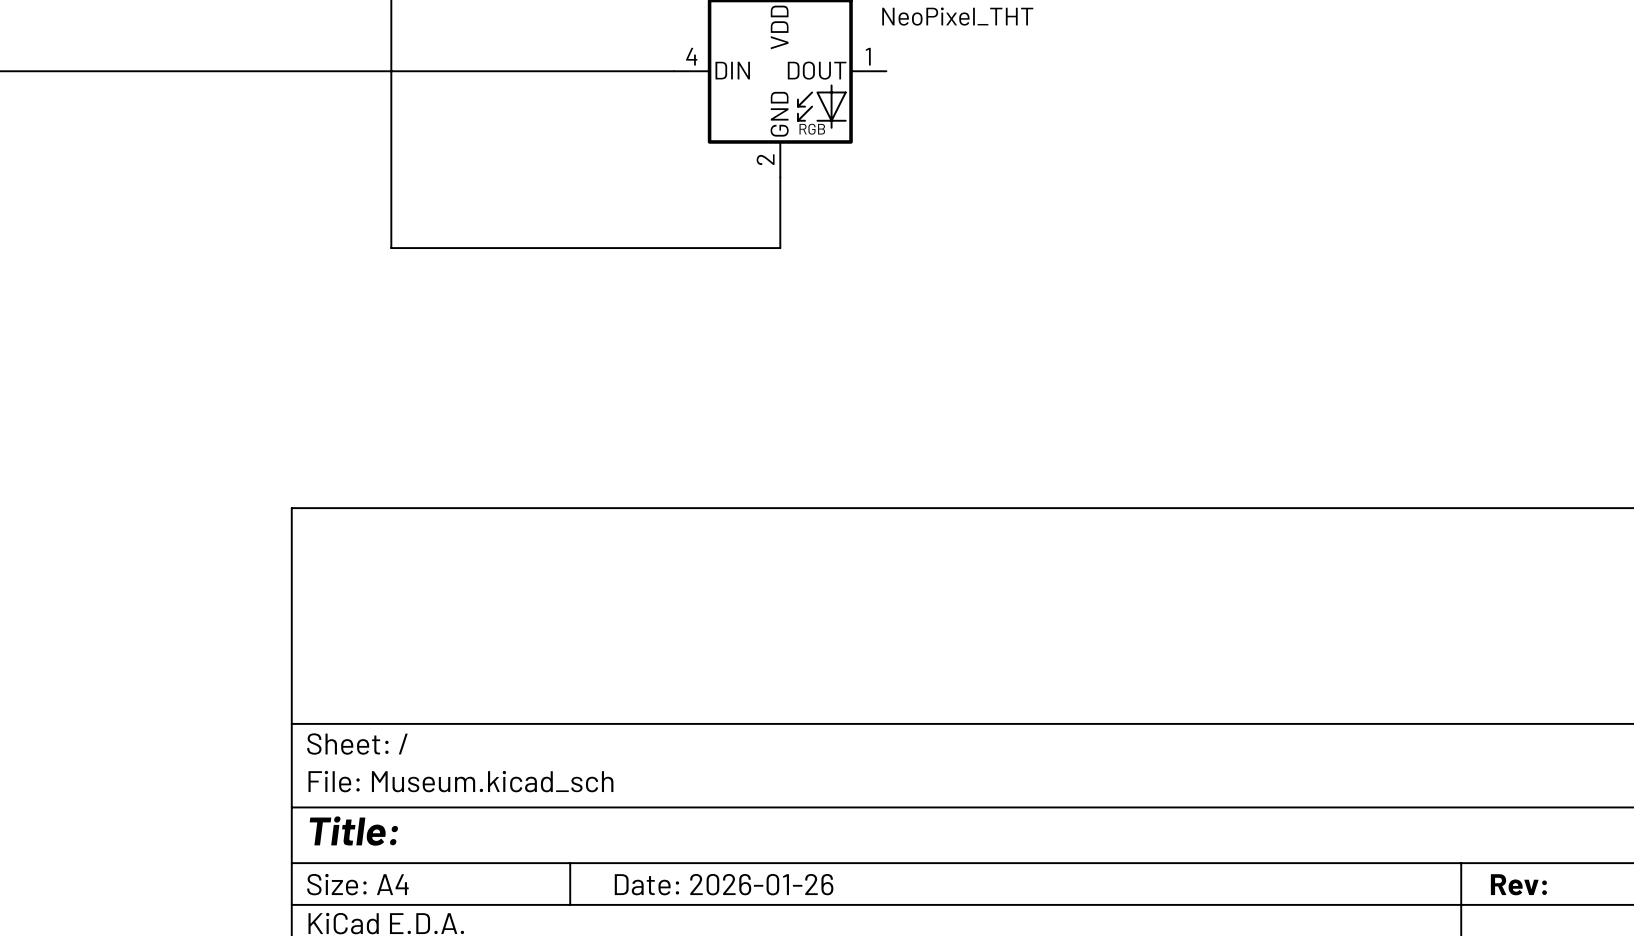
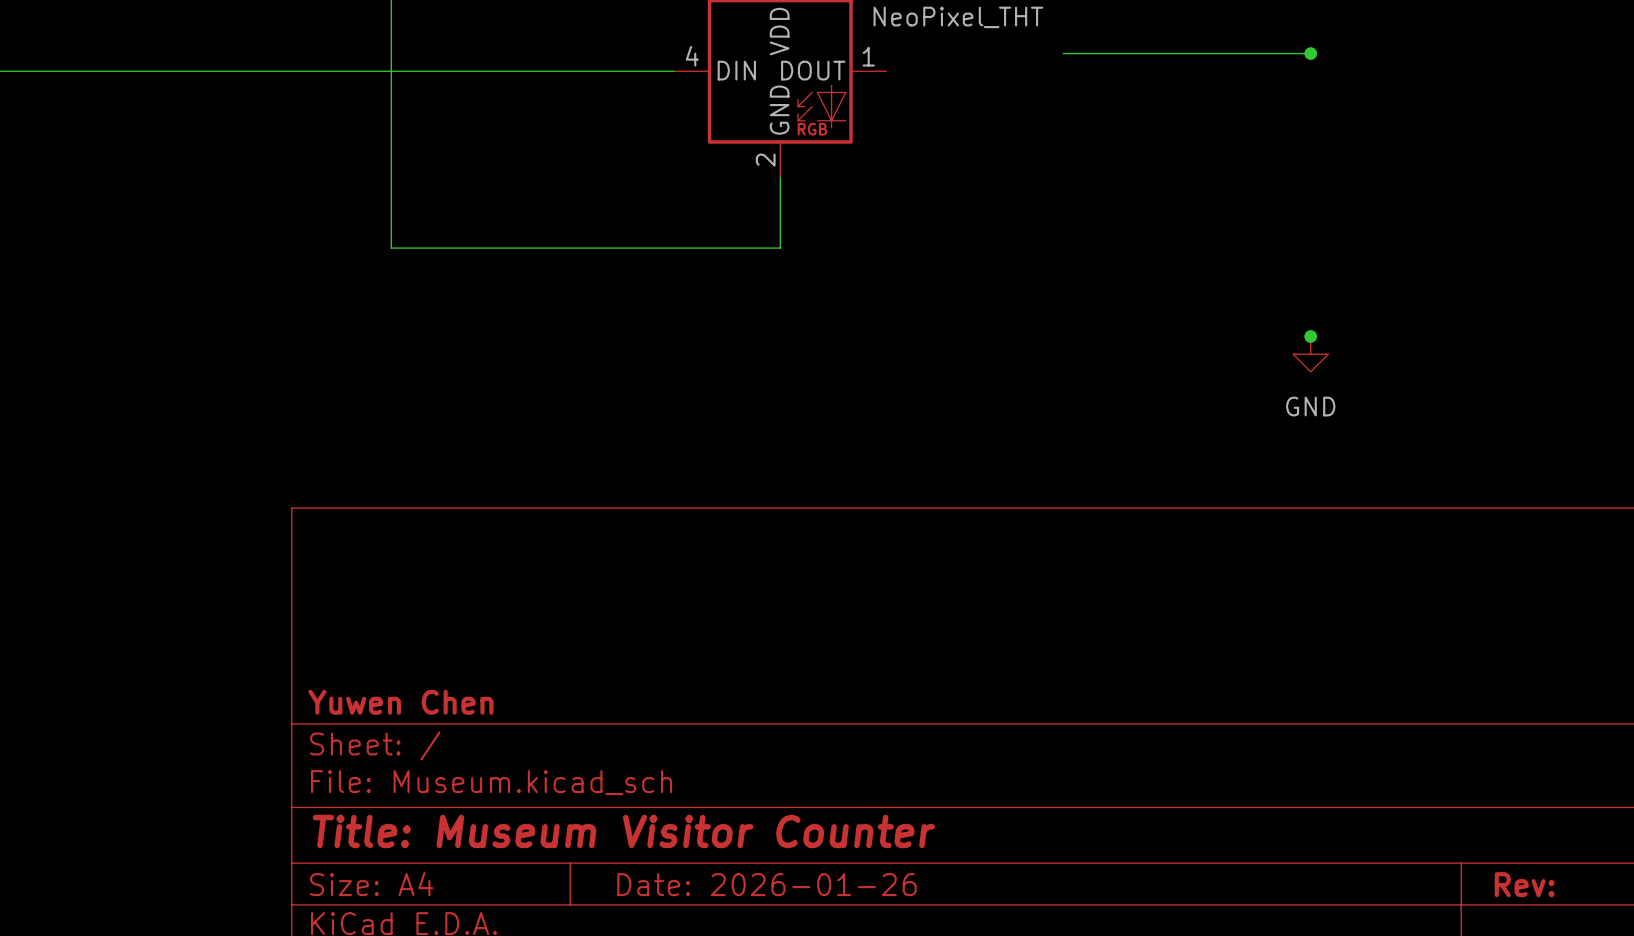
wire: none -> (1063, 53) (1310, 53)
junction: none -> (1310, 53)
junction: none -> (1310, 336)
power symbol: none -> GND (1310, 354)
title block: none -> Yuwen Chen (400, 702)
title block: Title: (353, 831) -> Title: Museum Visitor Counter (623, 831)

